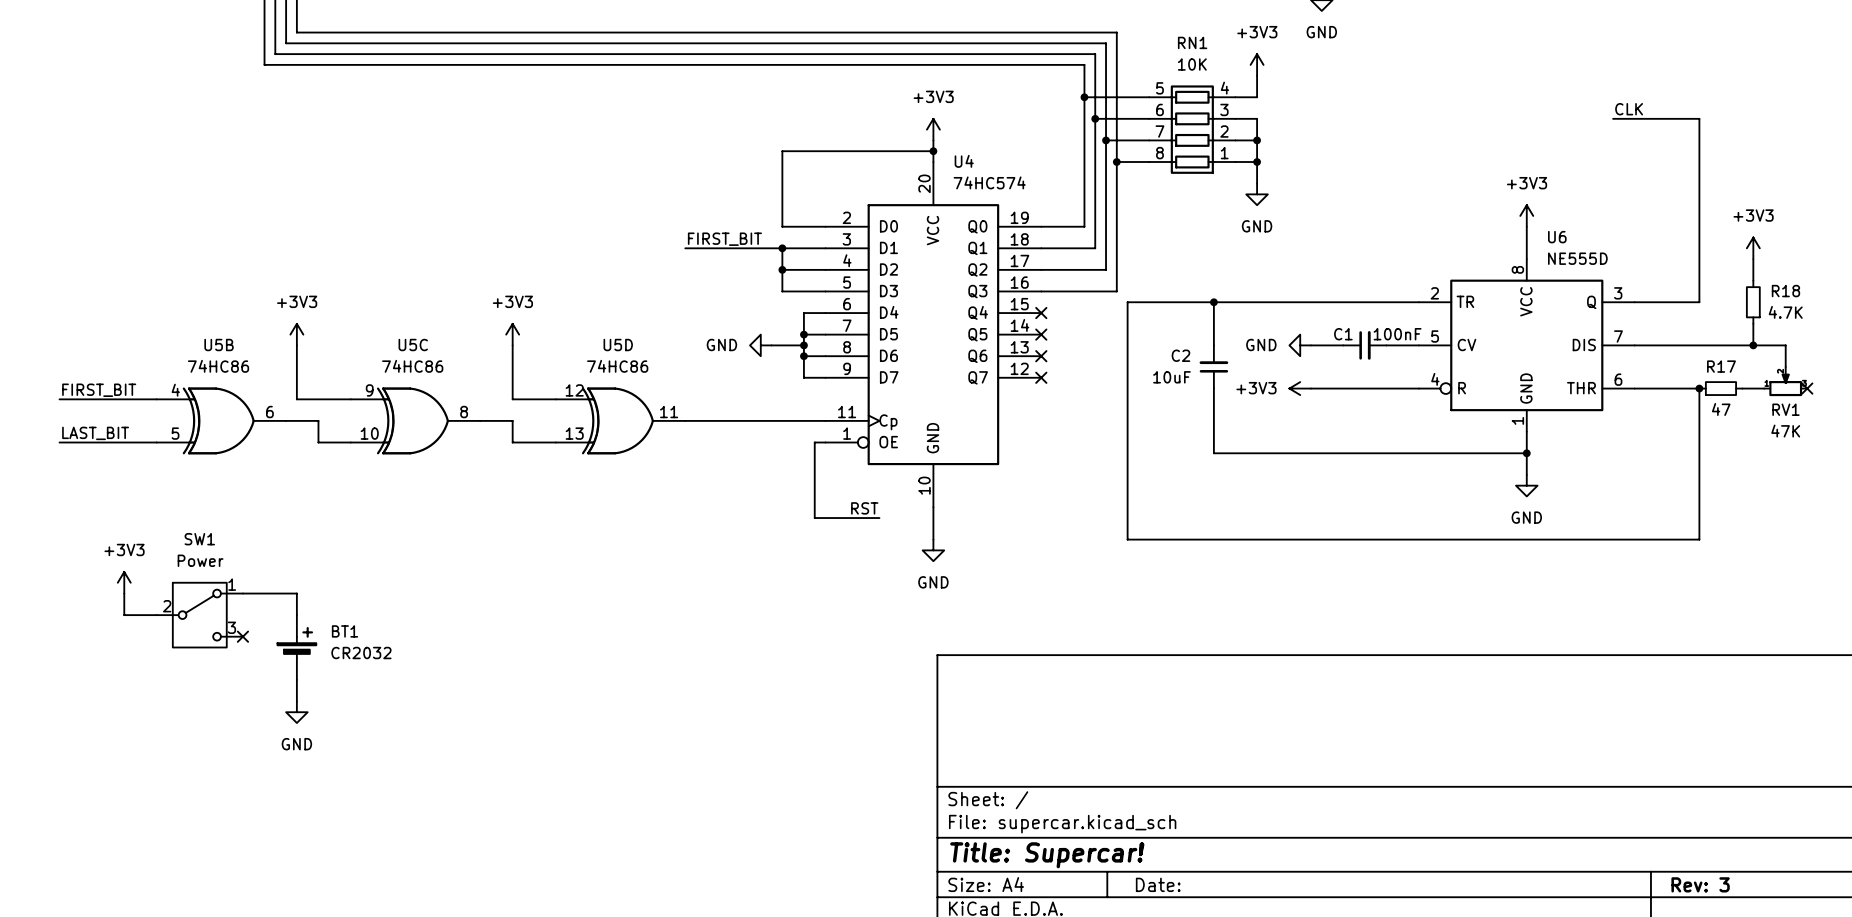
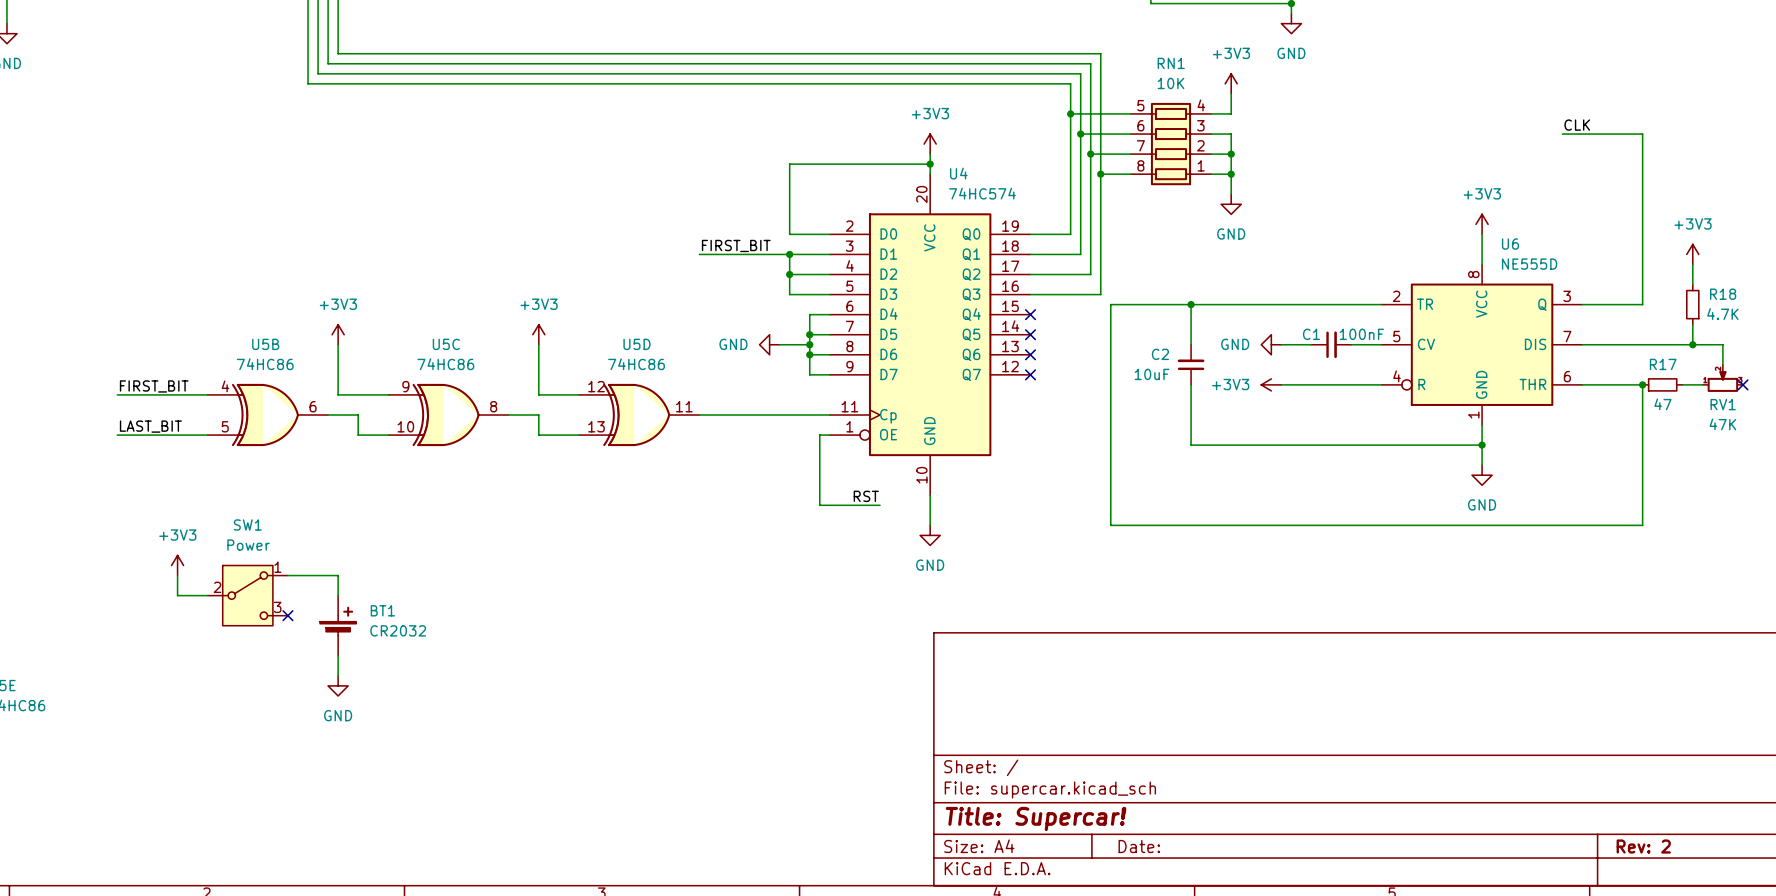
title block: Rev: 3 (1700, 884) -> Rev: 2 (1643, 846)

